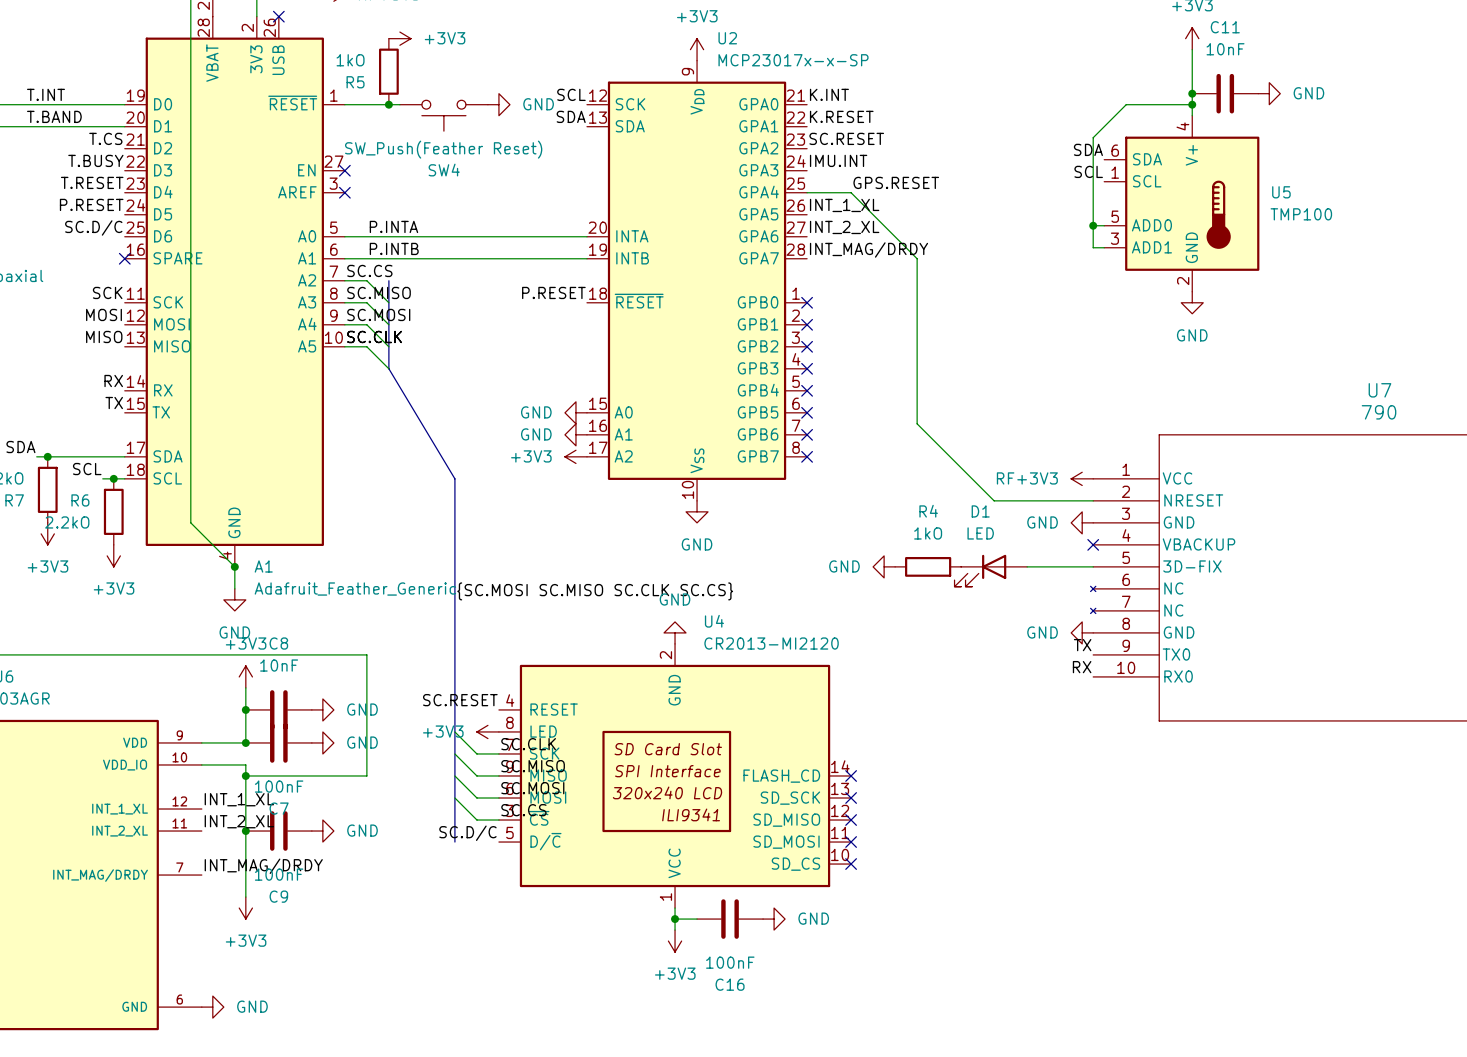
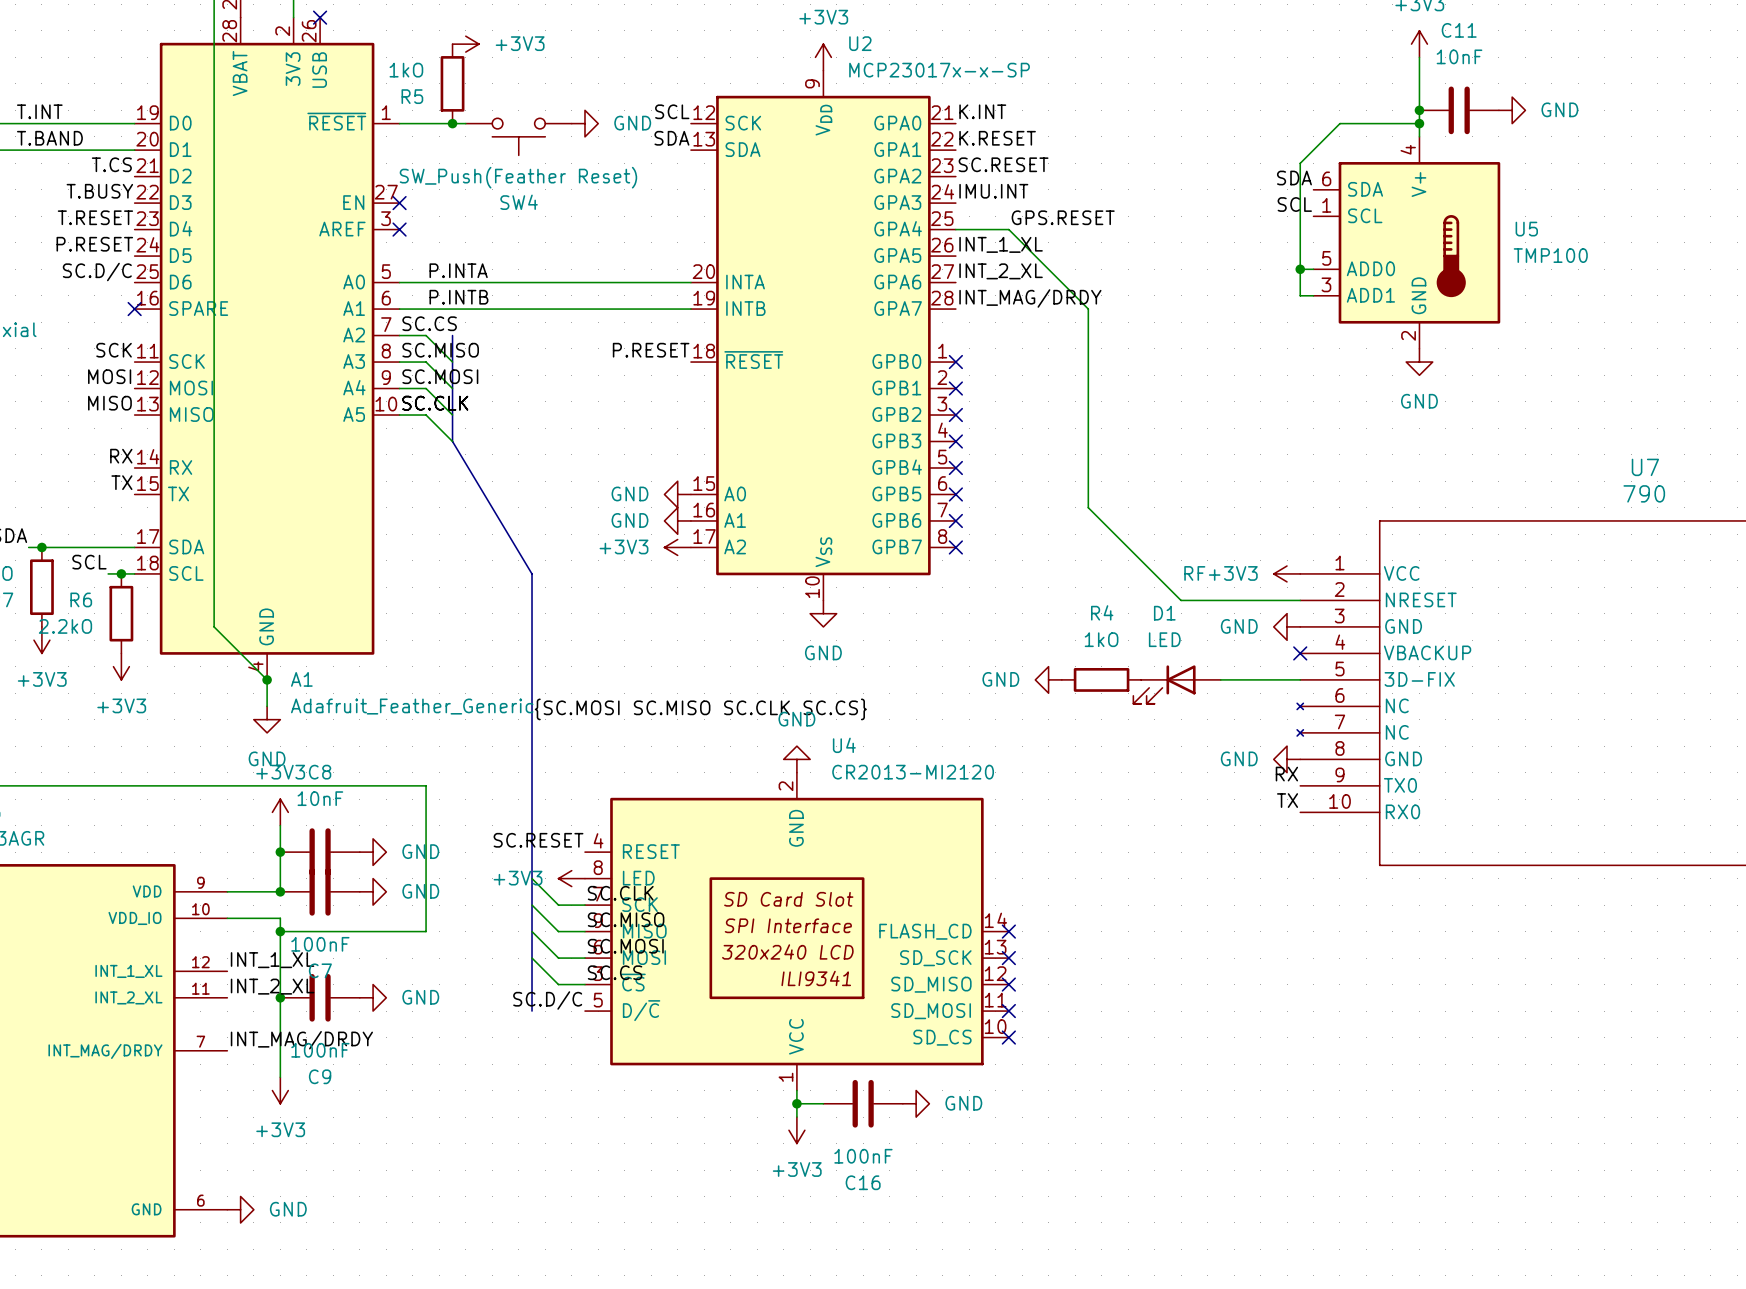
label: TX (1082, 645) -> RX (1286, 774)
label: RX (1082, 667) -> TX (1287, 800)

